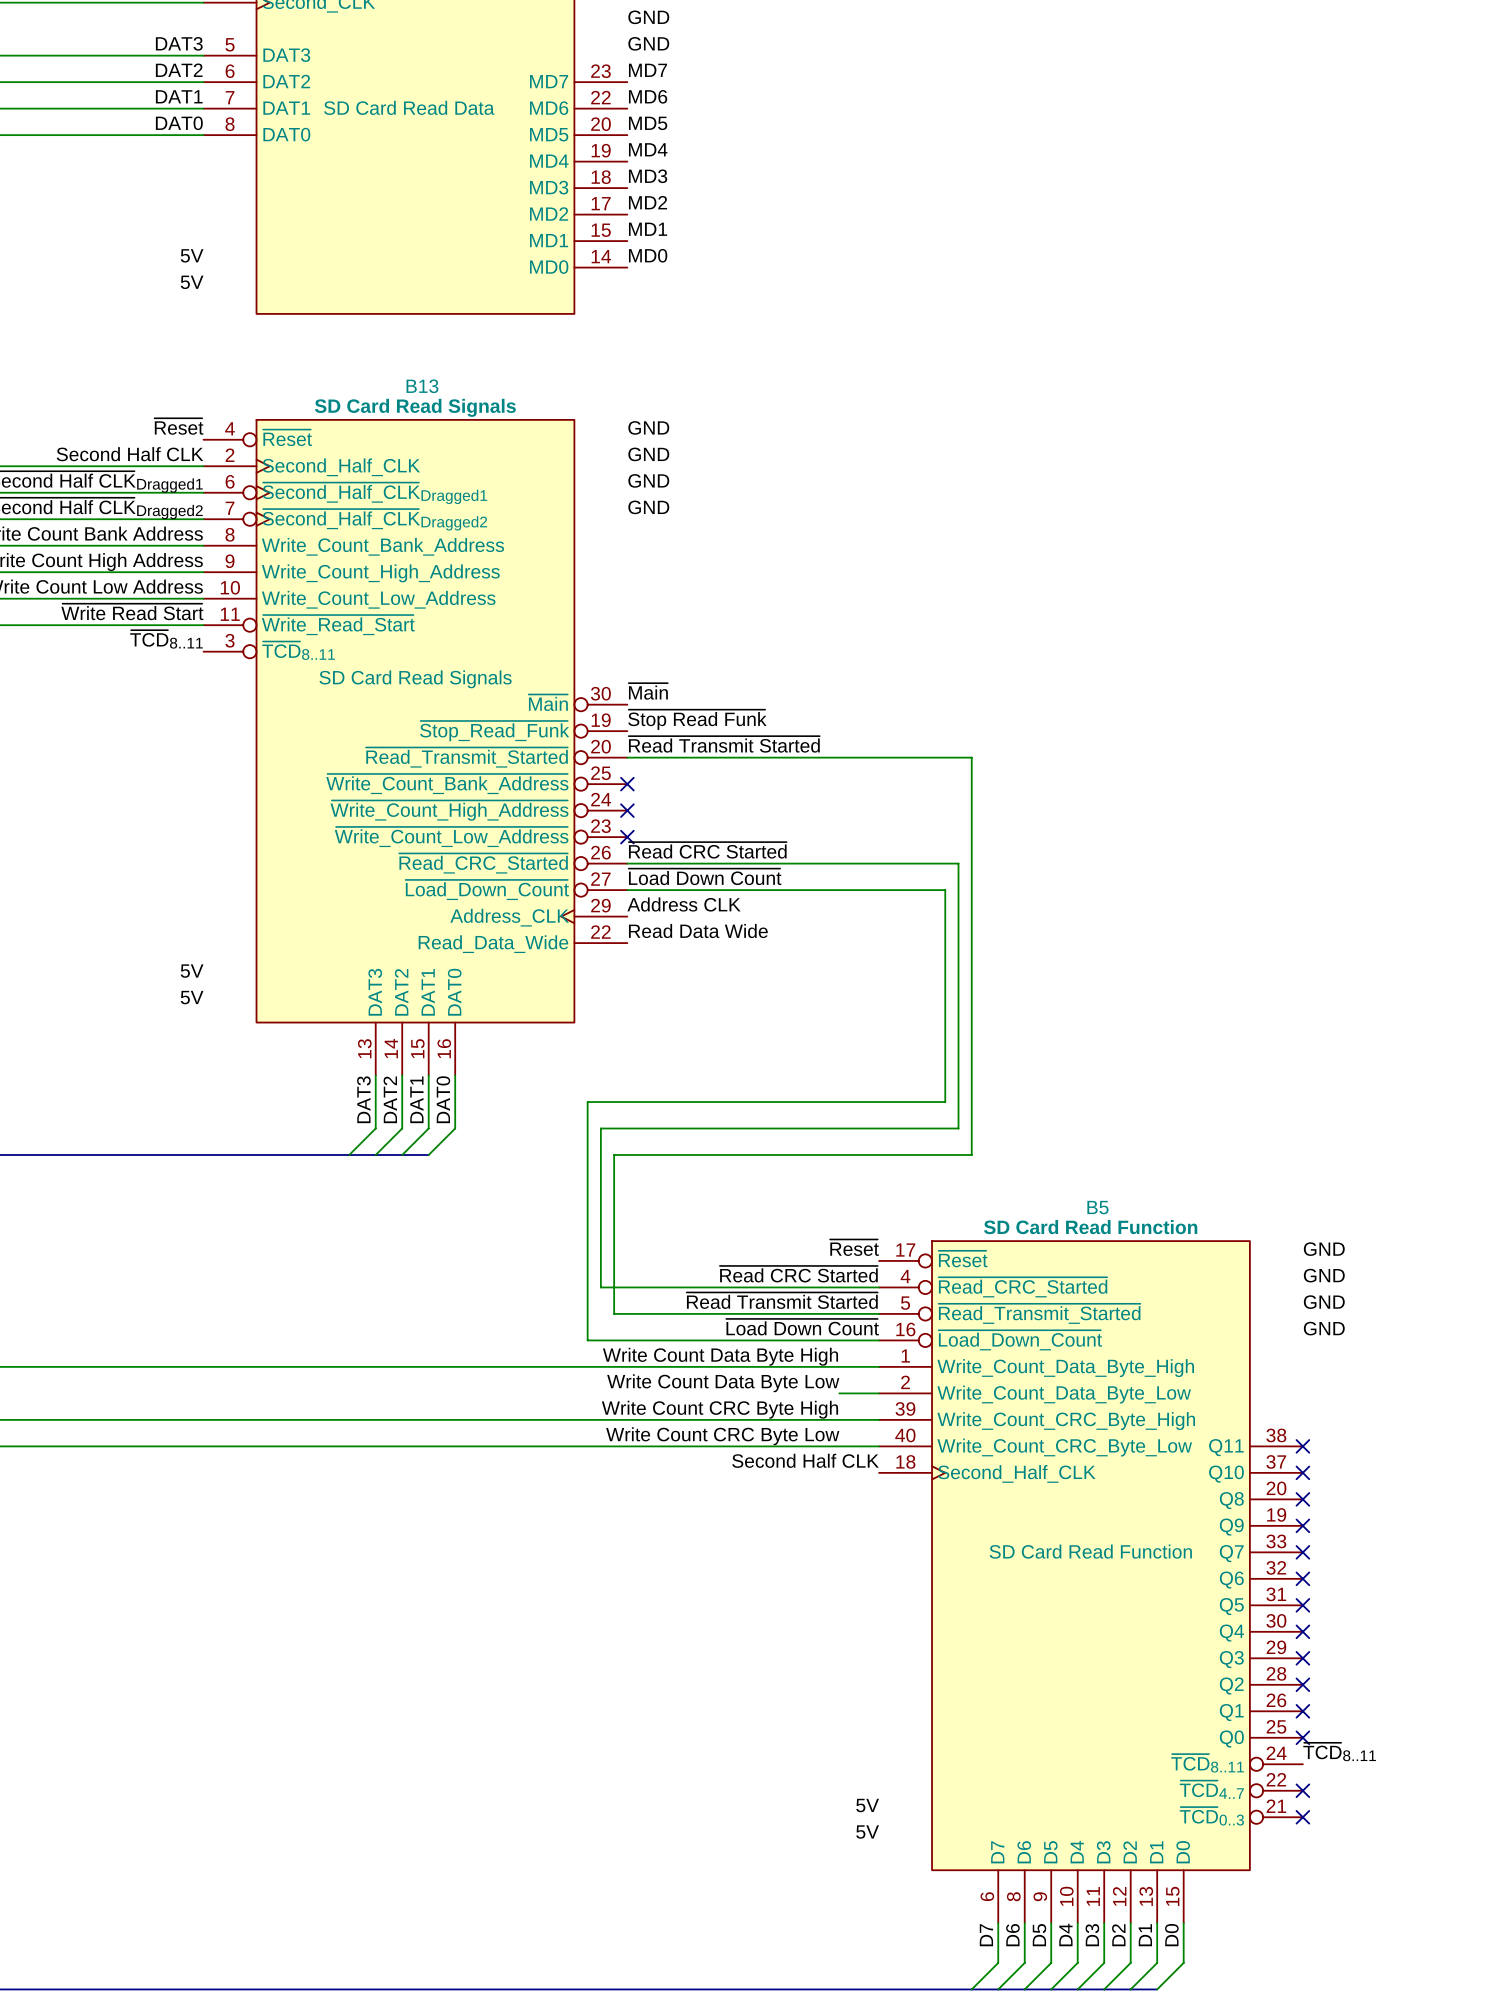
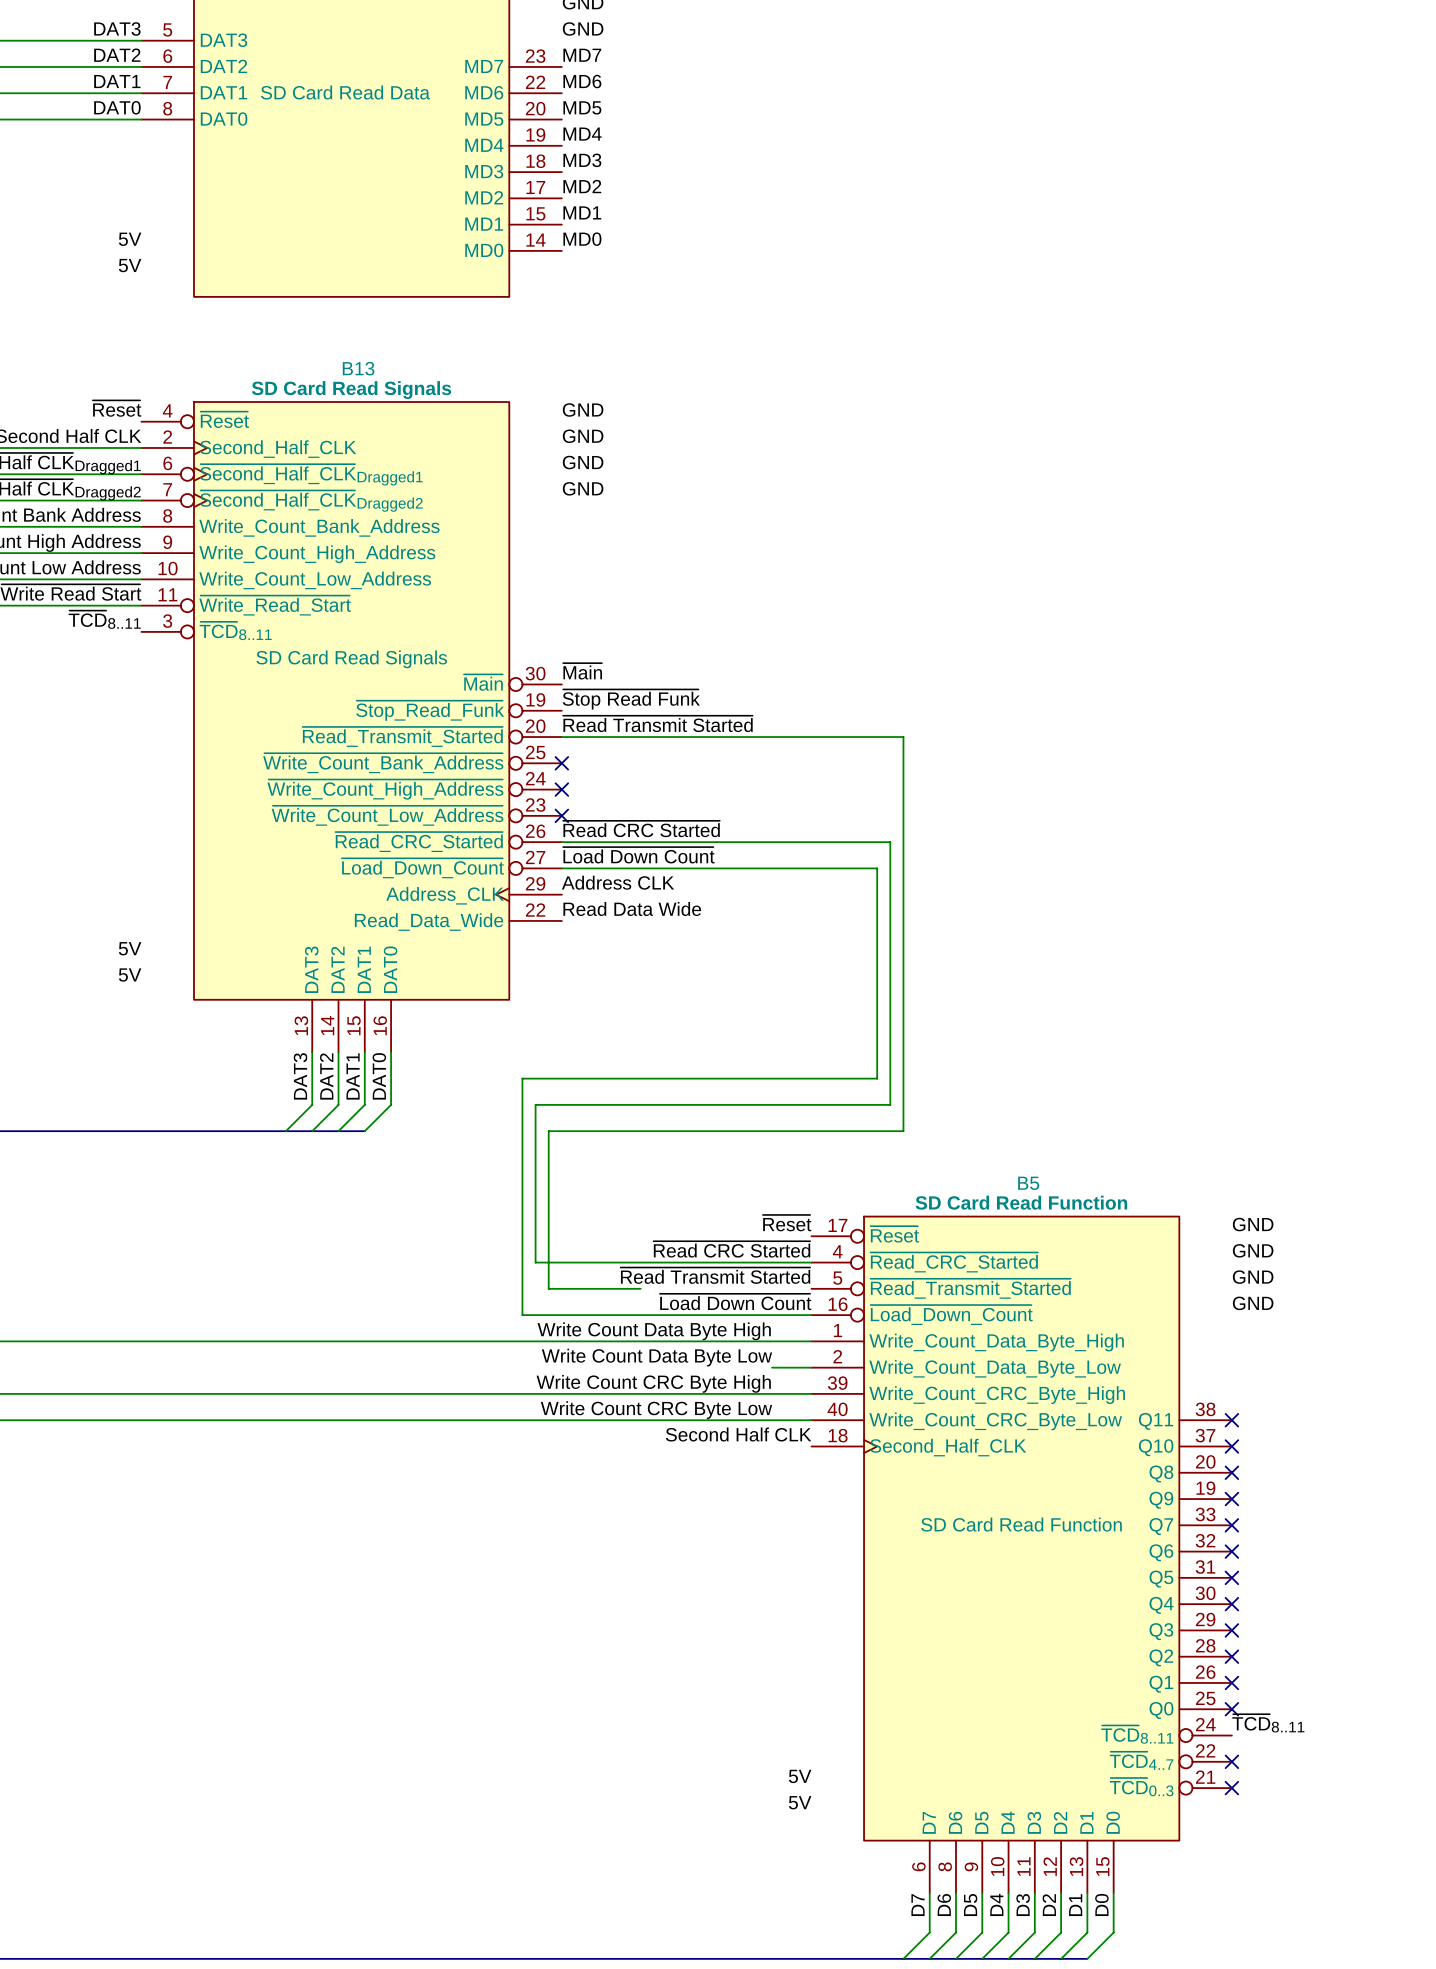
wire: (706, 1313) (879, 1313) -> none

